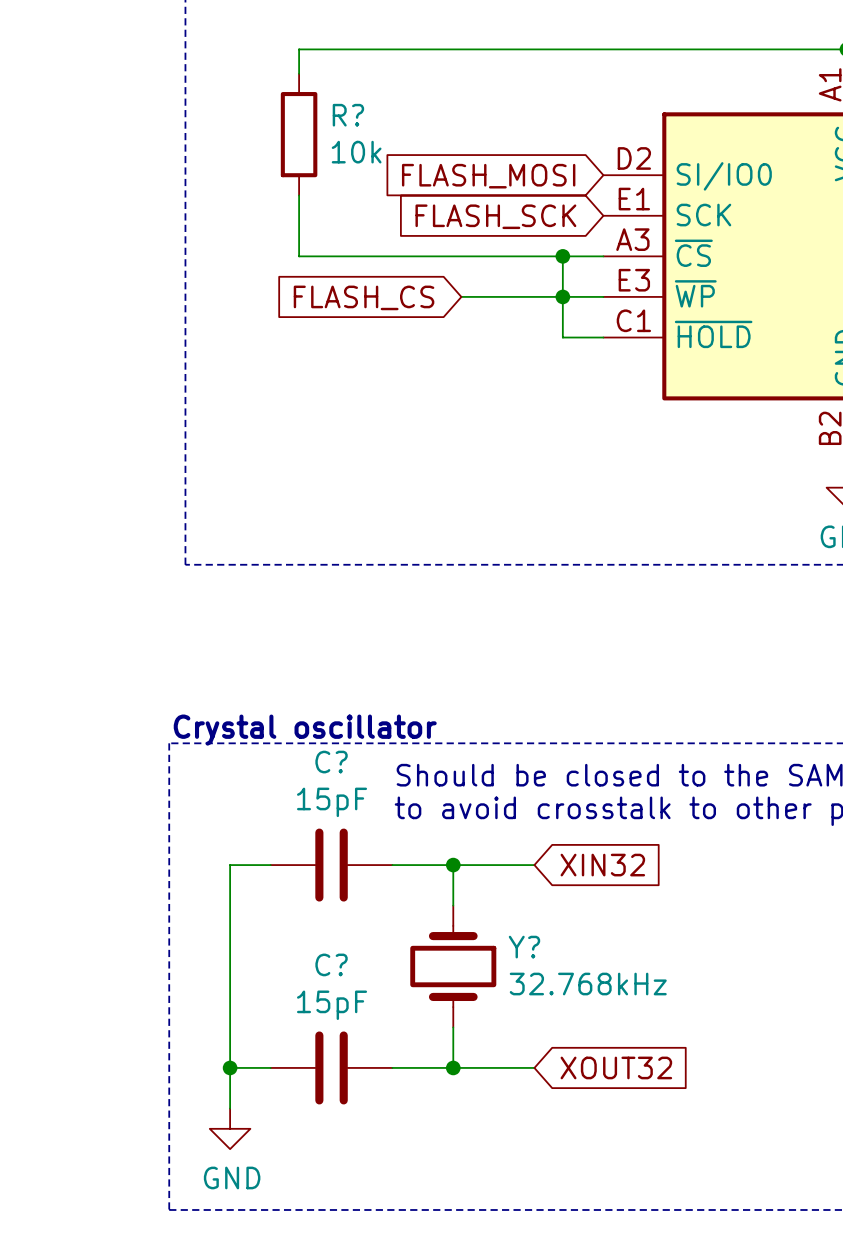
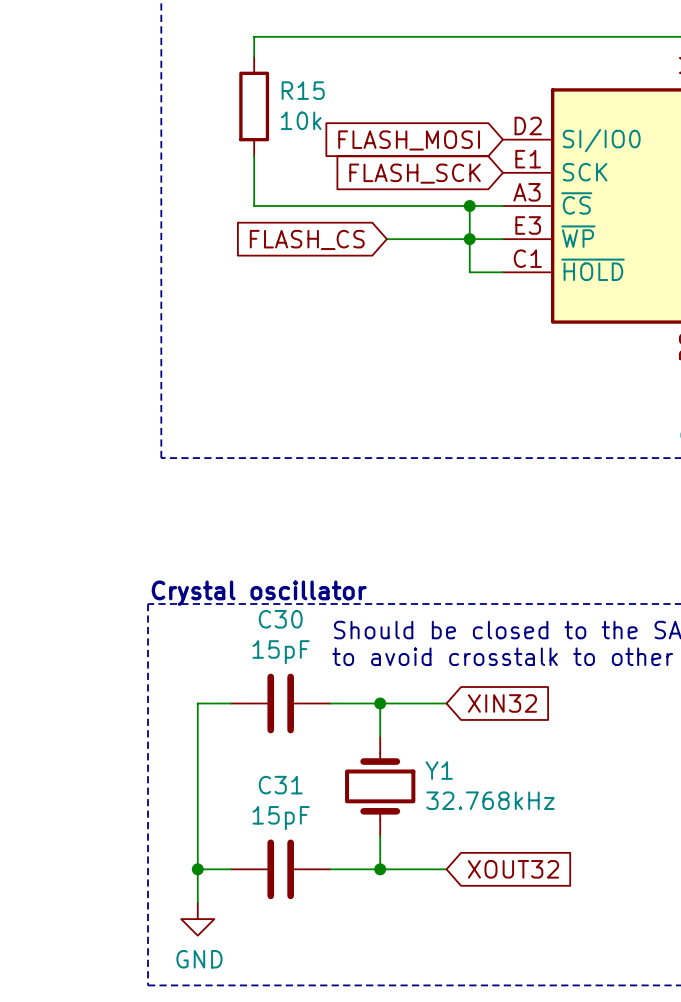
R? name: R? (348, 115) -> R15 (303, 90)
C? name: C? (331, 762) -> C30 (280, 619)
Y? name: Y? (524, 947) -> Y1 (439, 770)
C? name: C? (331, 964) -> C31 (280, 785)

